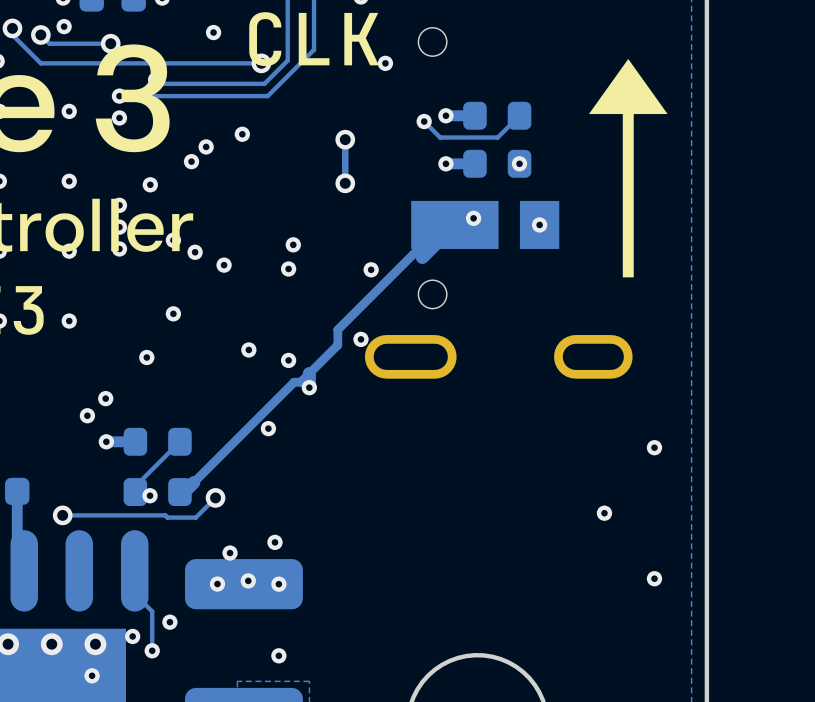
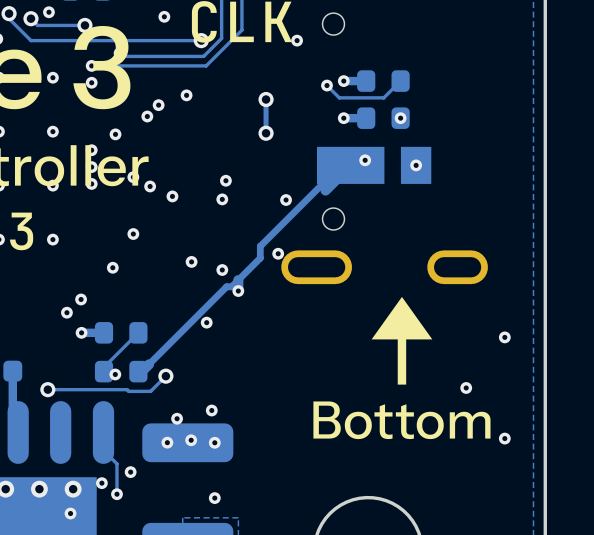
drawing: [588, 59, 668, 278] -> none
drawing: none -> [313, 296, 491, 440]

